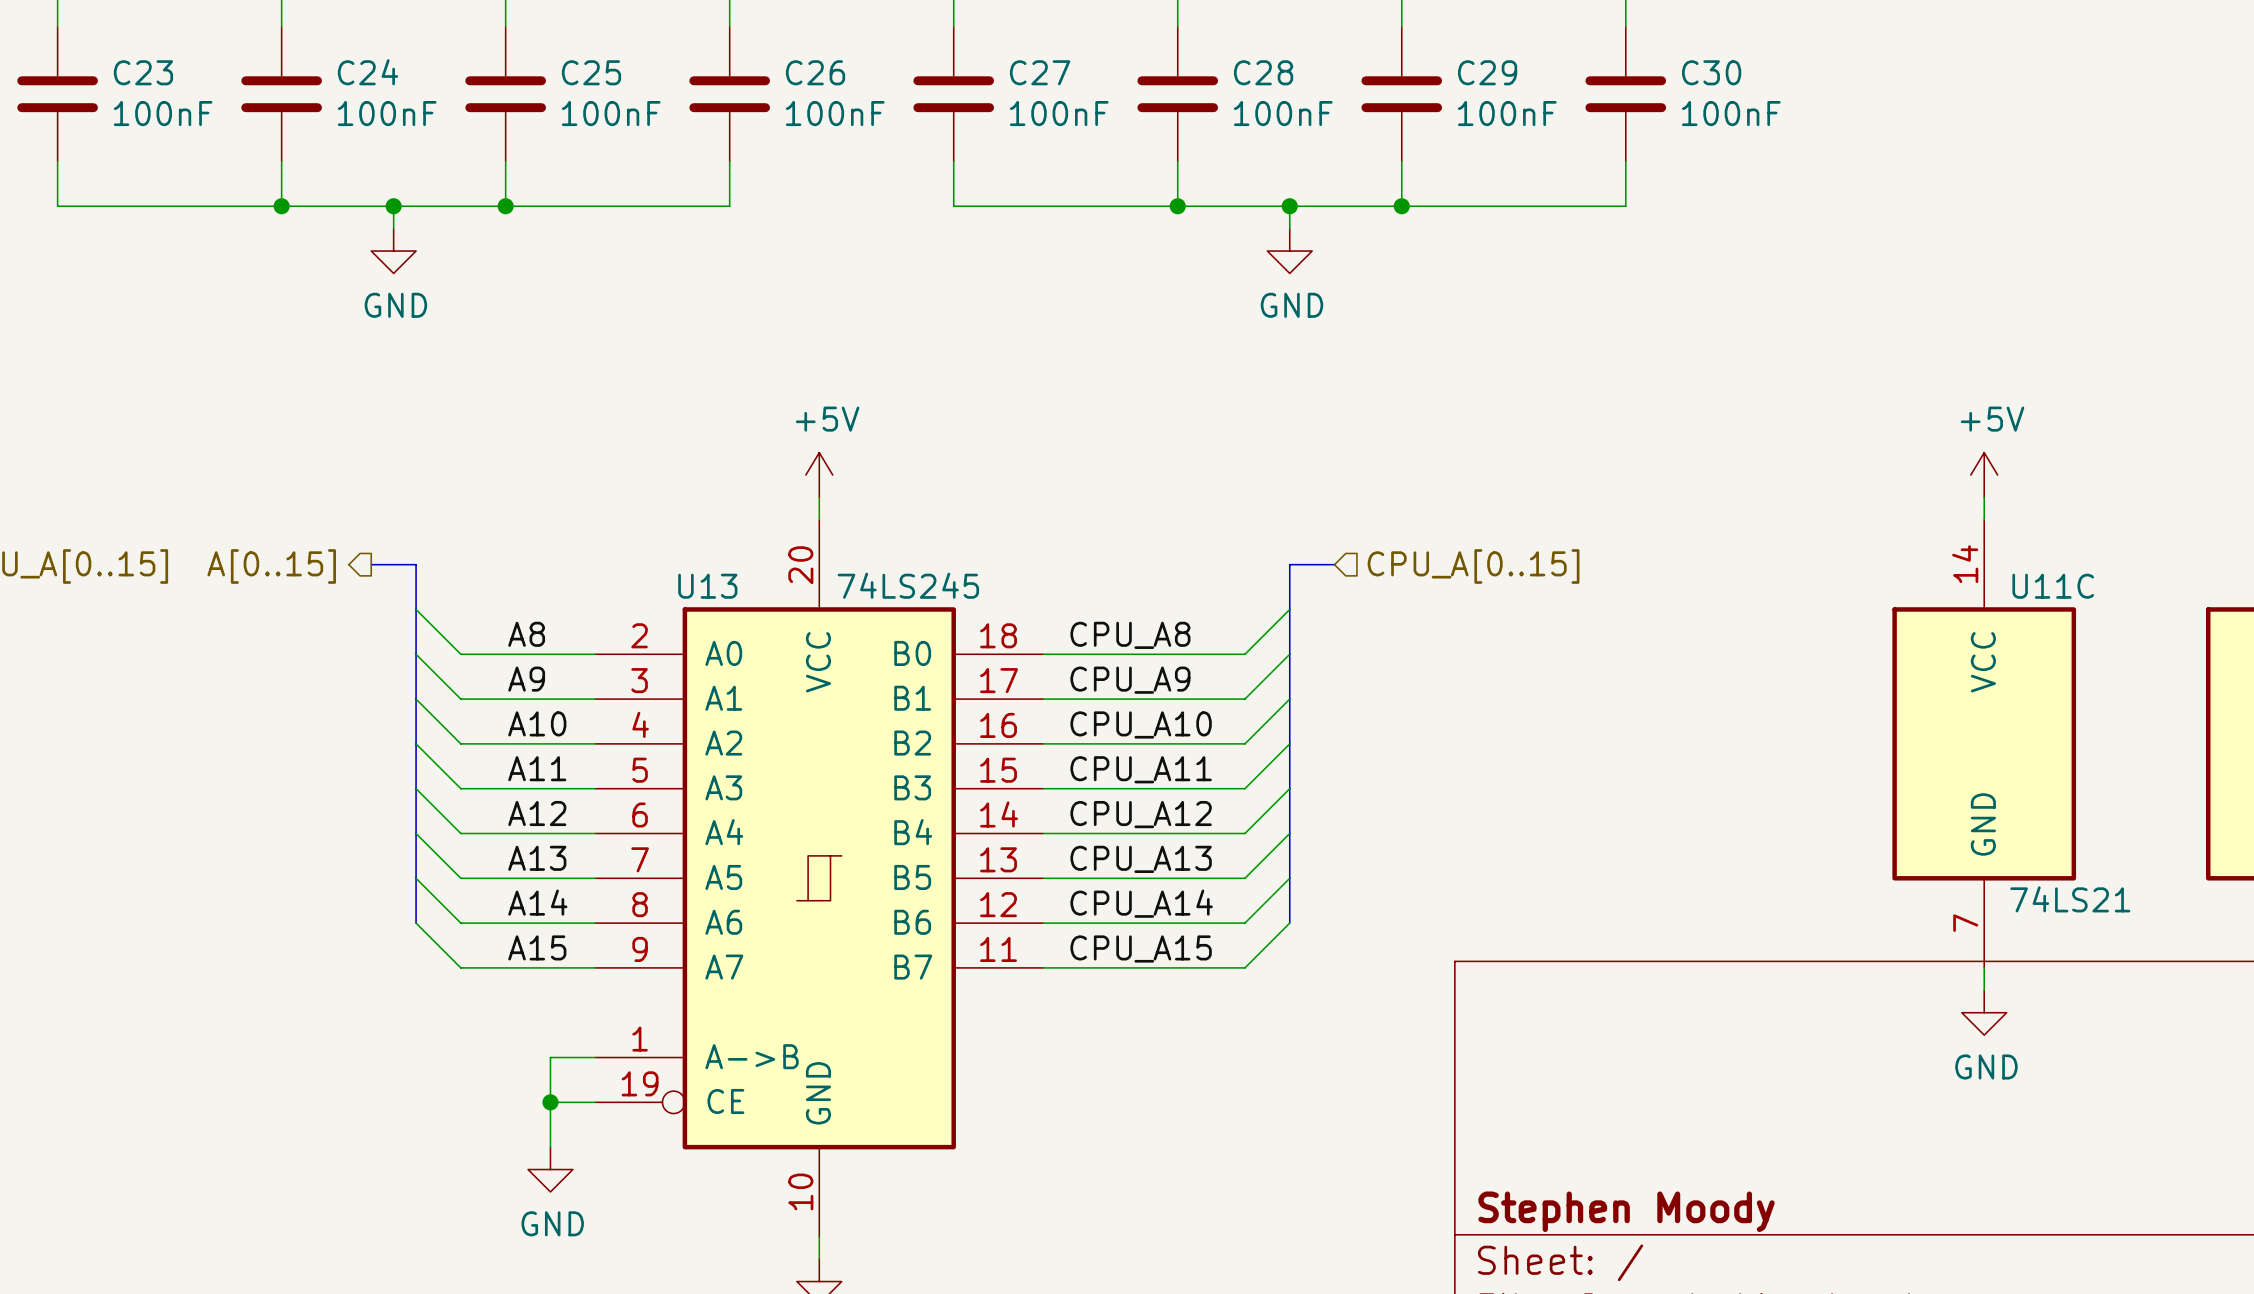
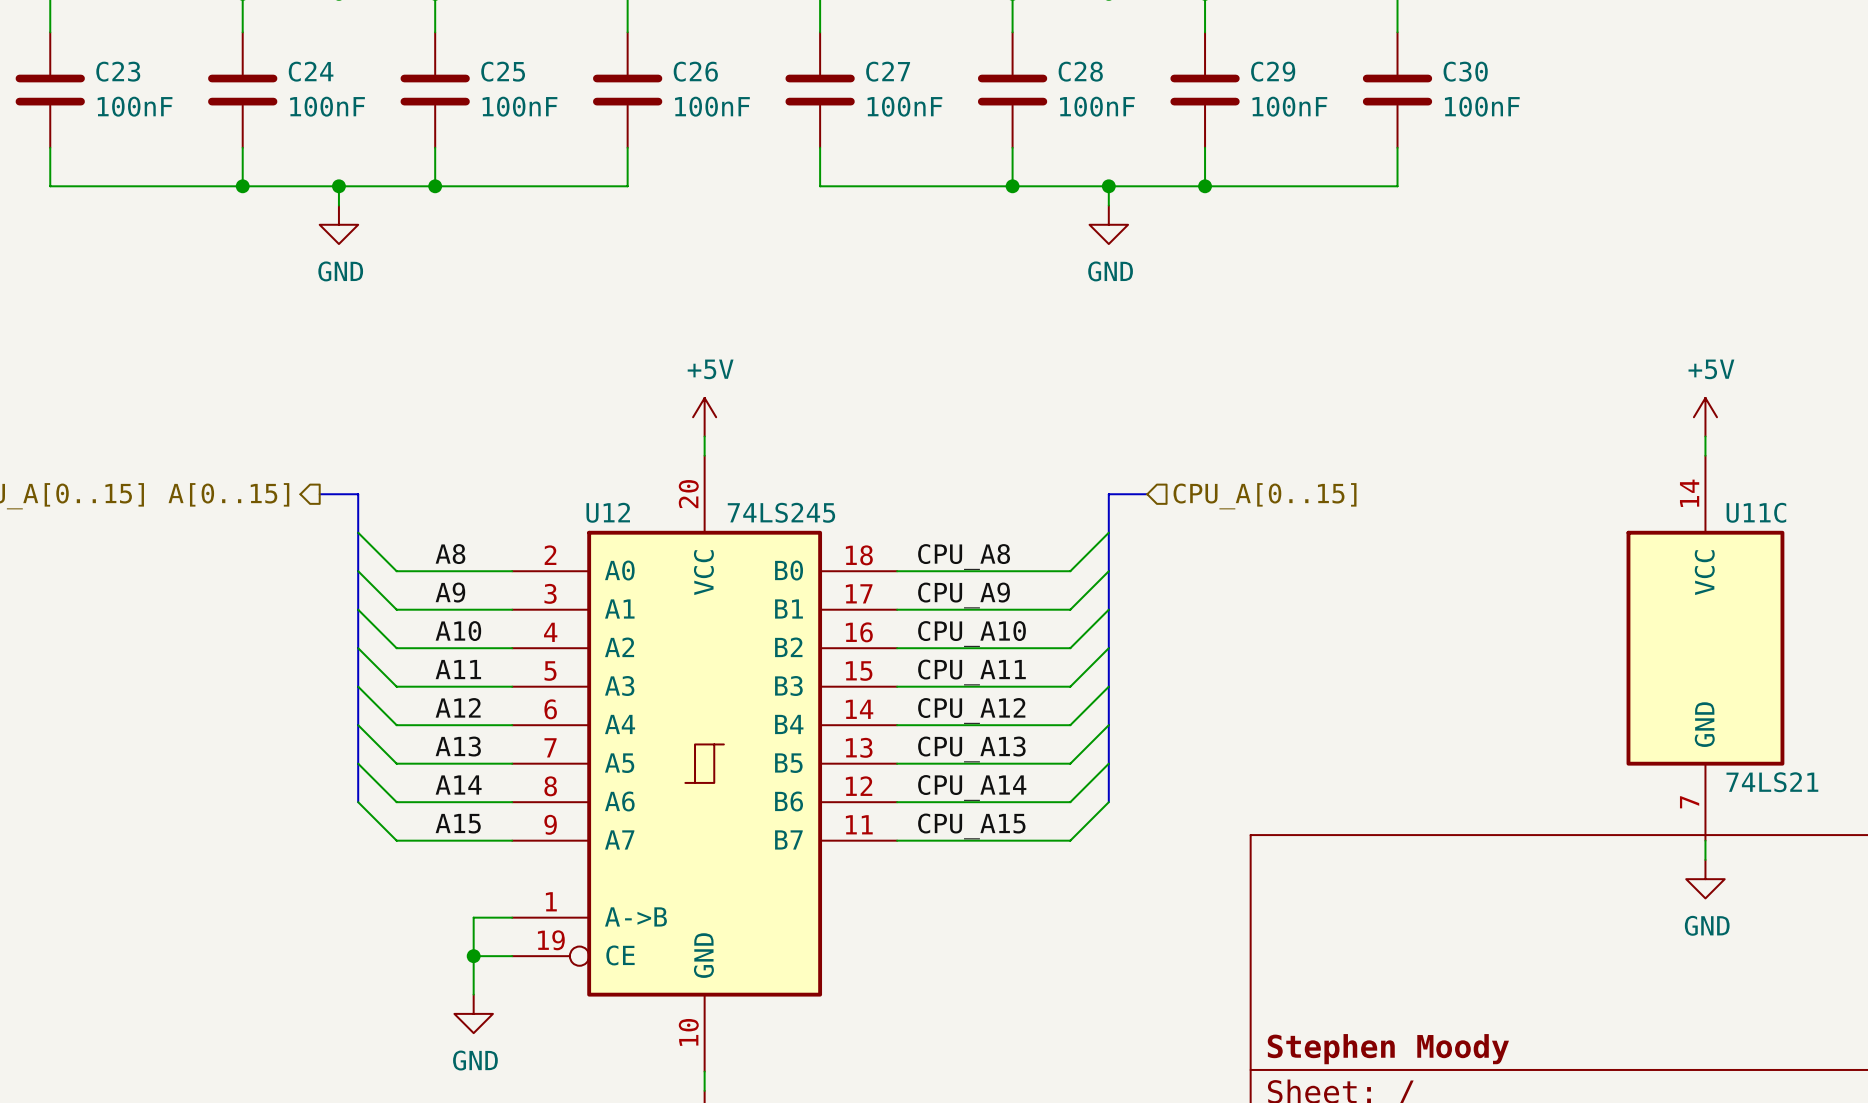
U13 name: U13 (707, 586) -> U12 (608, 512)

